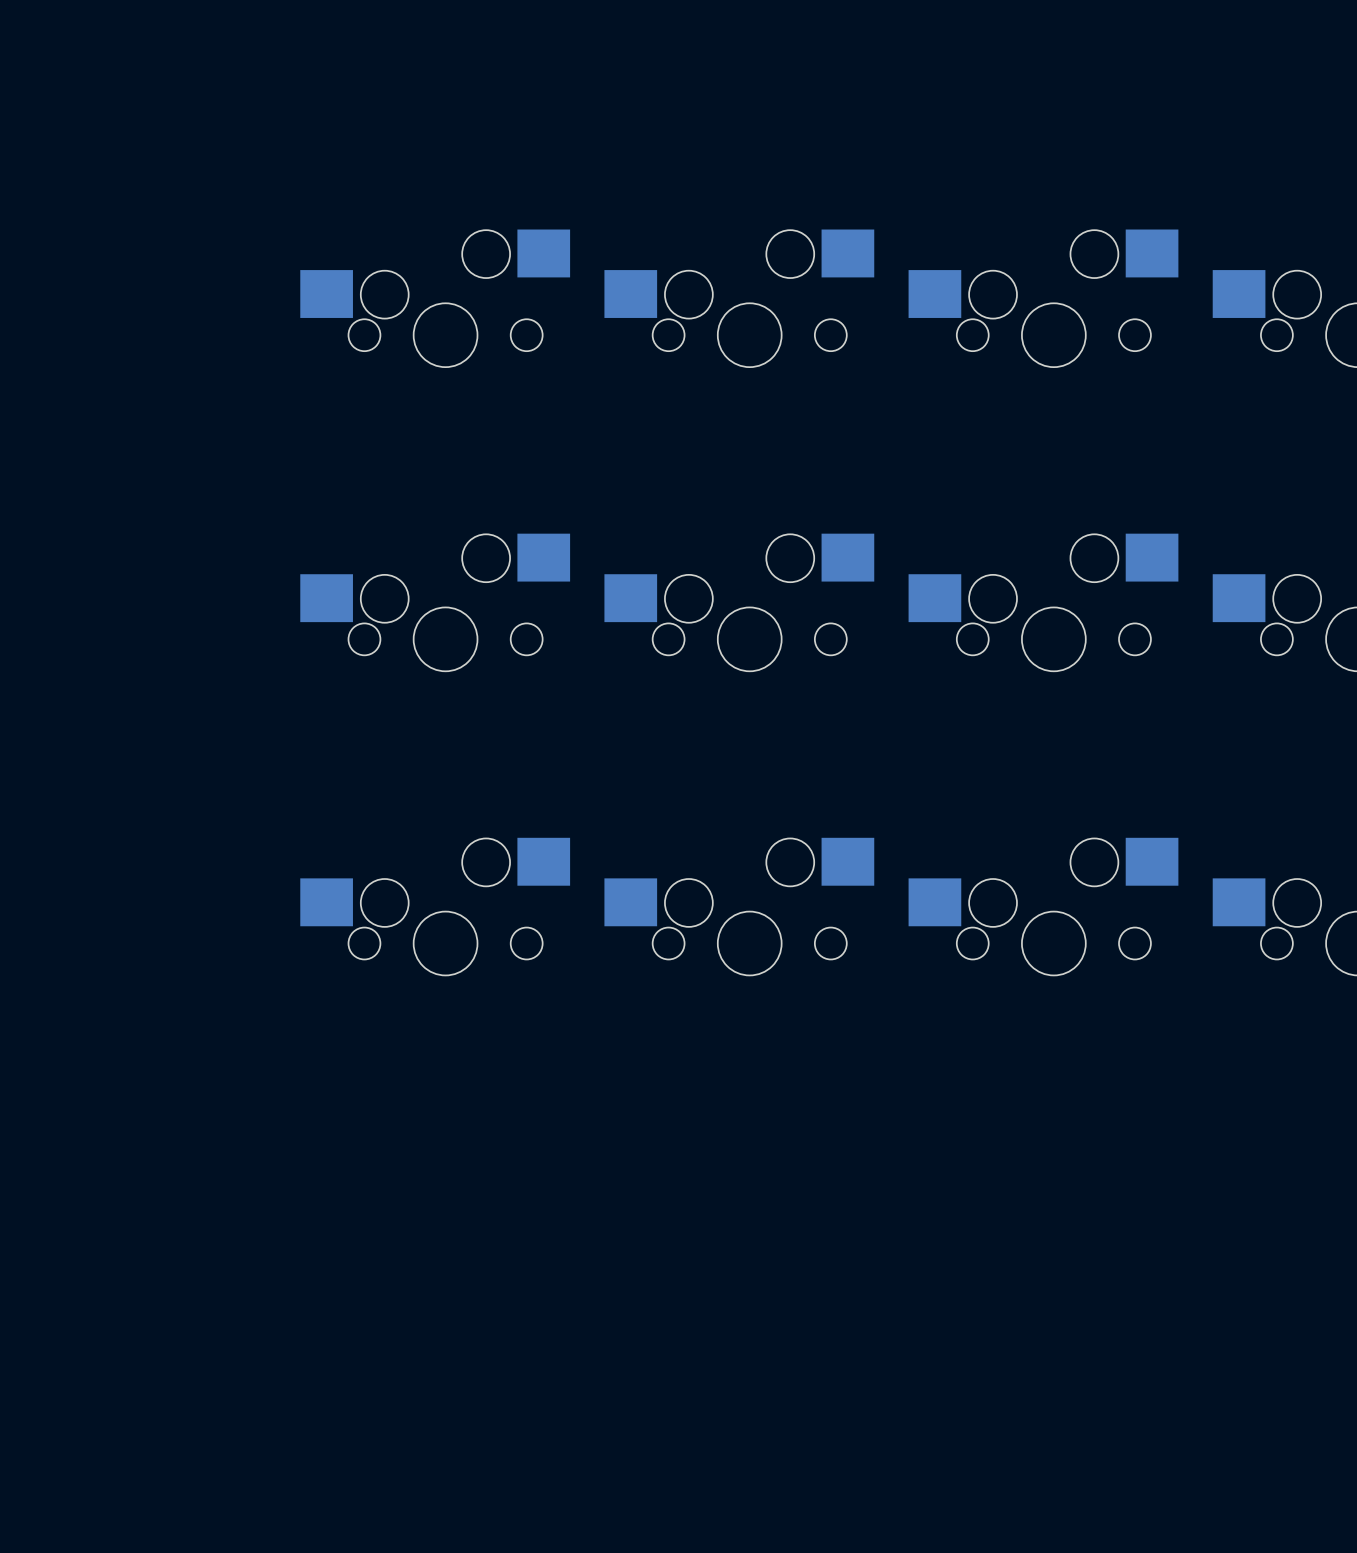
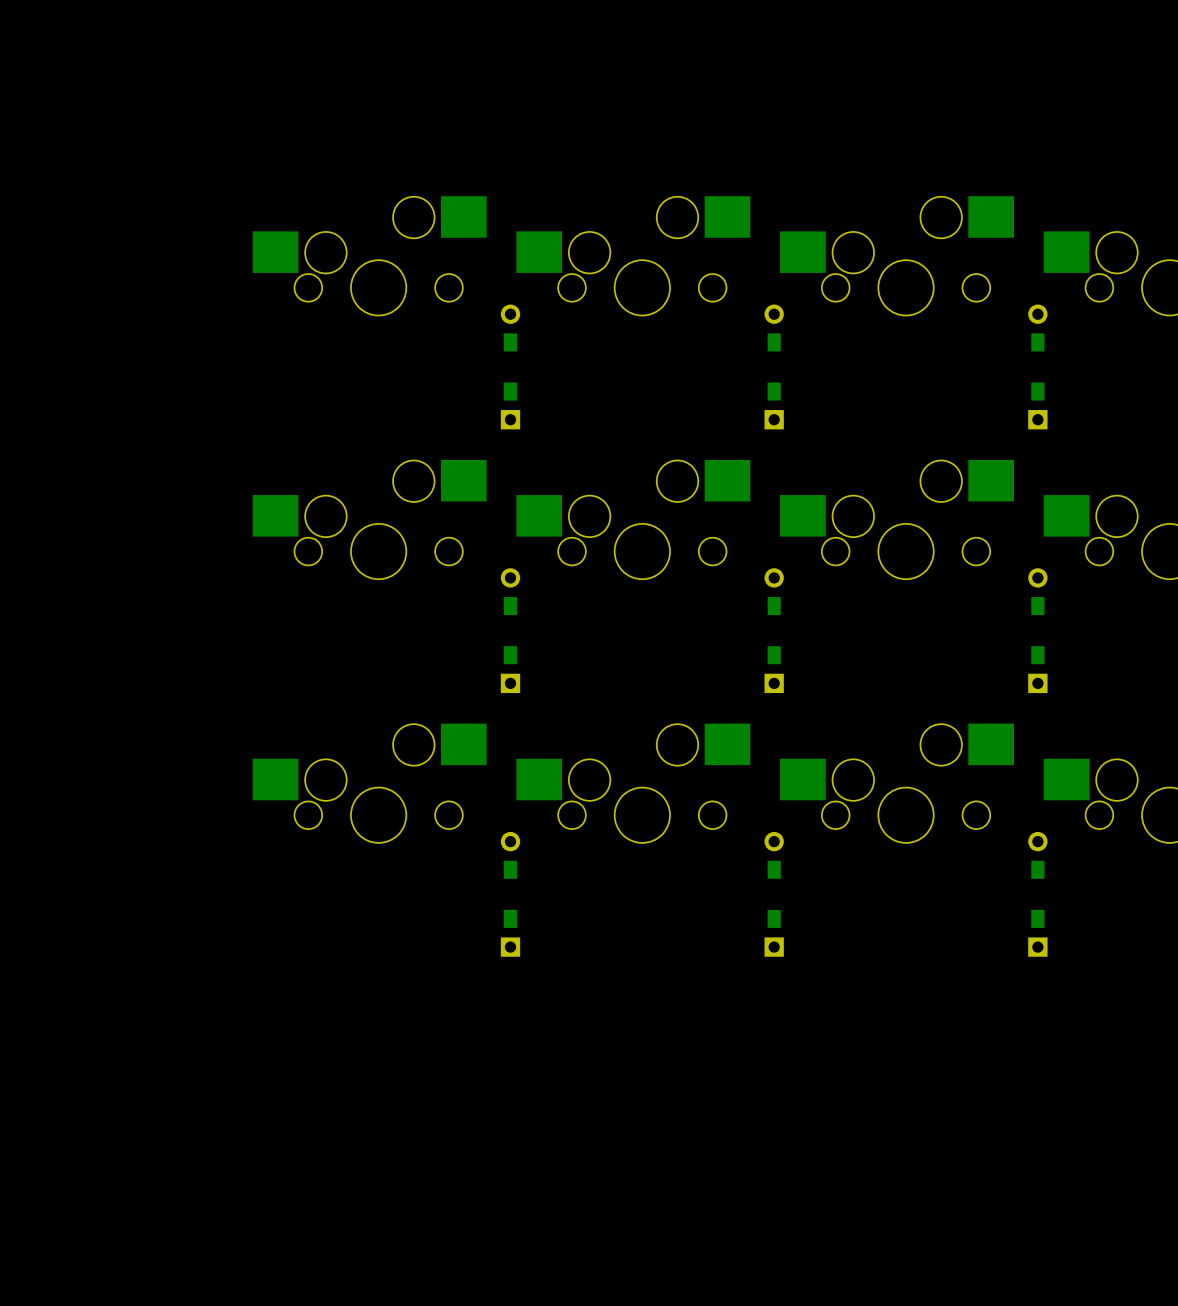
part: none -> (510, 366)
part: none -> (774, 366)
part: none -> (1037, 366)
part: none -> (510, 630)
part: none -> (774, 630)
part: none -> (1037, 630)
part: none -> (510, 894)
part: none -> (774, 894)
part: none -> (1037, 894)

